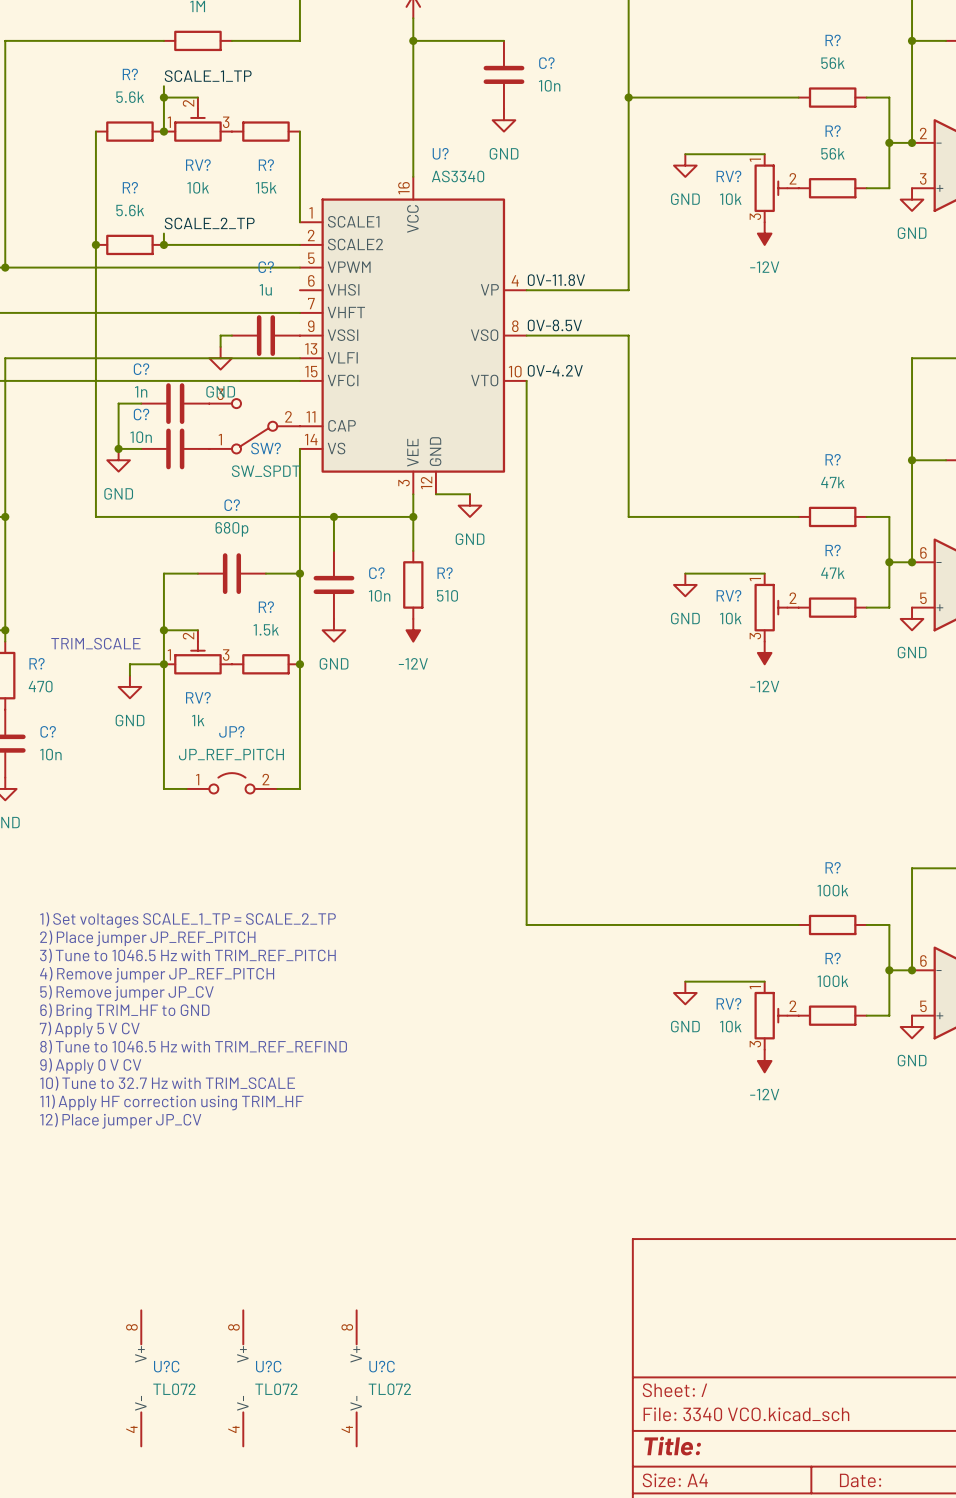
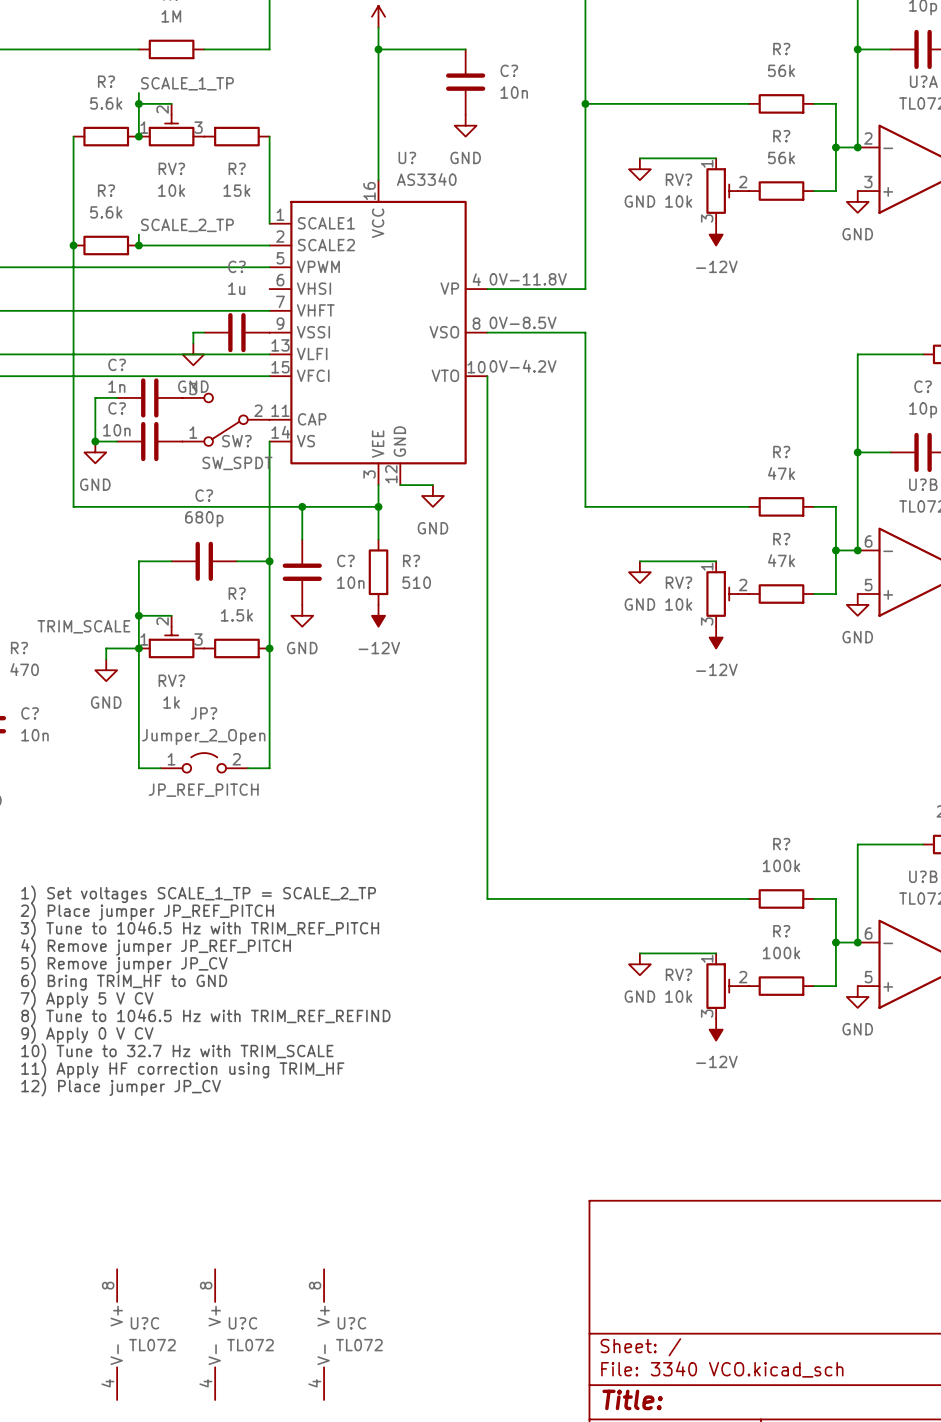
RV? text: none -> TRIM_SCALE (83, 626)
text: TRIM_SCALE (95, 643) -> none
JP? value: JP_REF_PITCH (231, 754) -> Jumper_2_Open (203, 737)
JP? text: none -> JP_REF_PITCH (203, 790)

